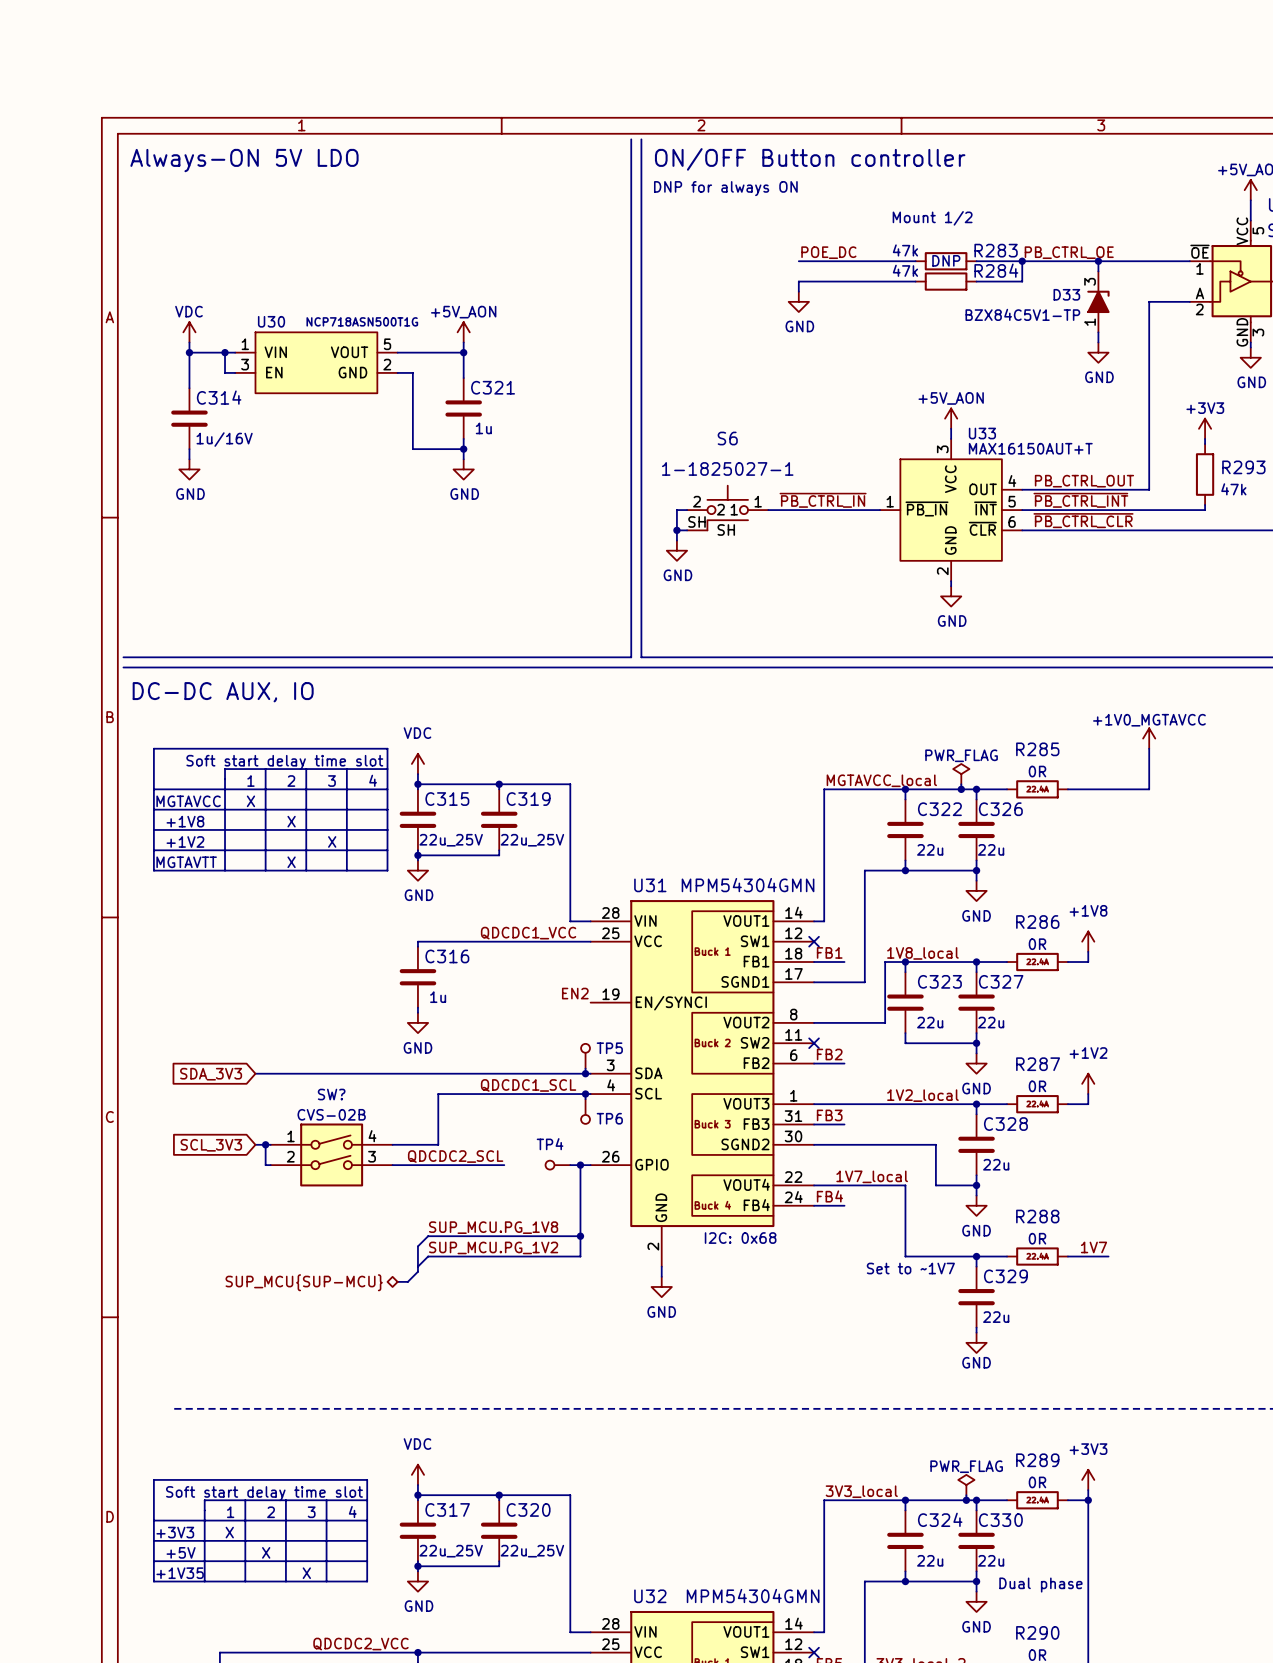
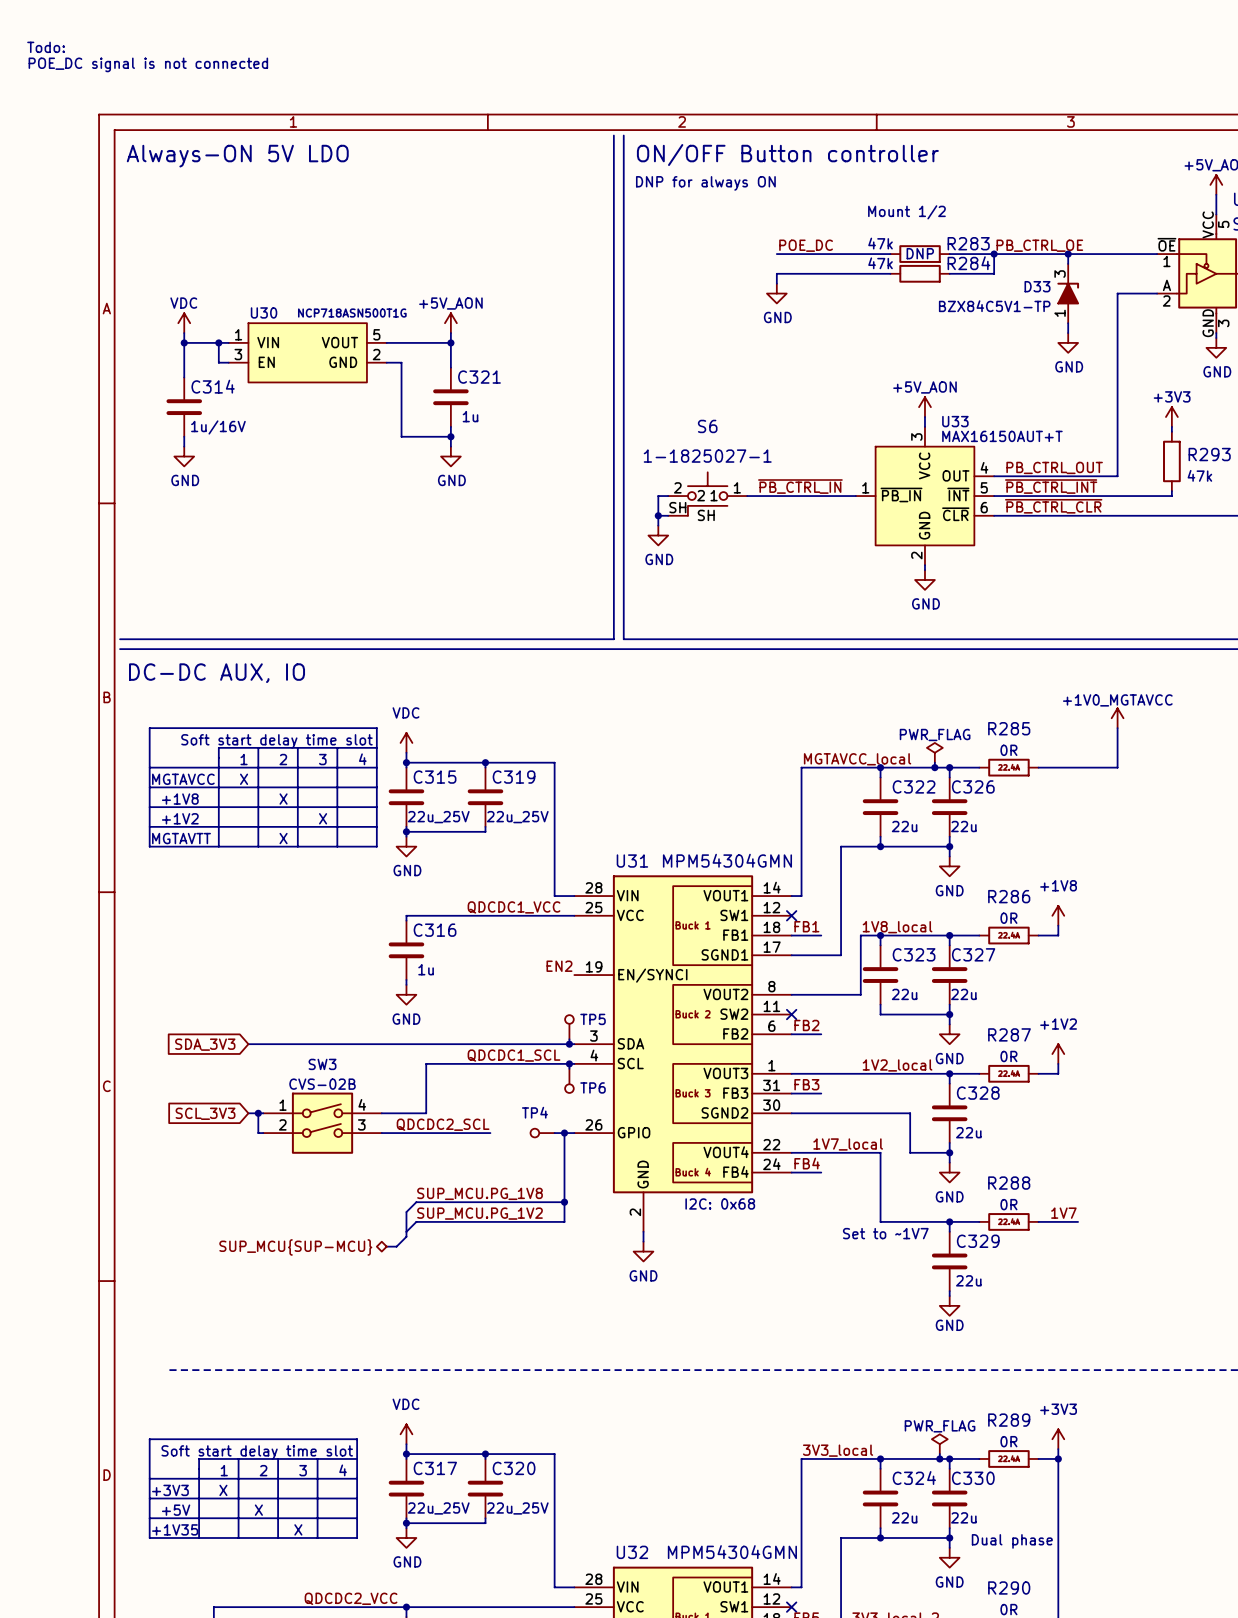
text: none -> Todo: (46, 47)
text: none -> POE_DC signal is not connected (148, 64)
SW? name: SW? (331, 1094) -> SW3 (322, 1064)

